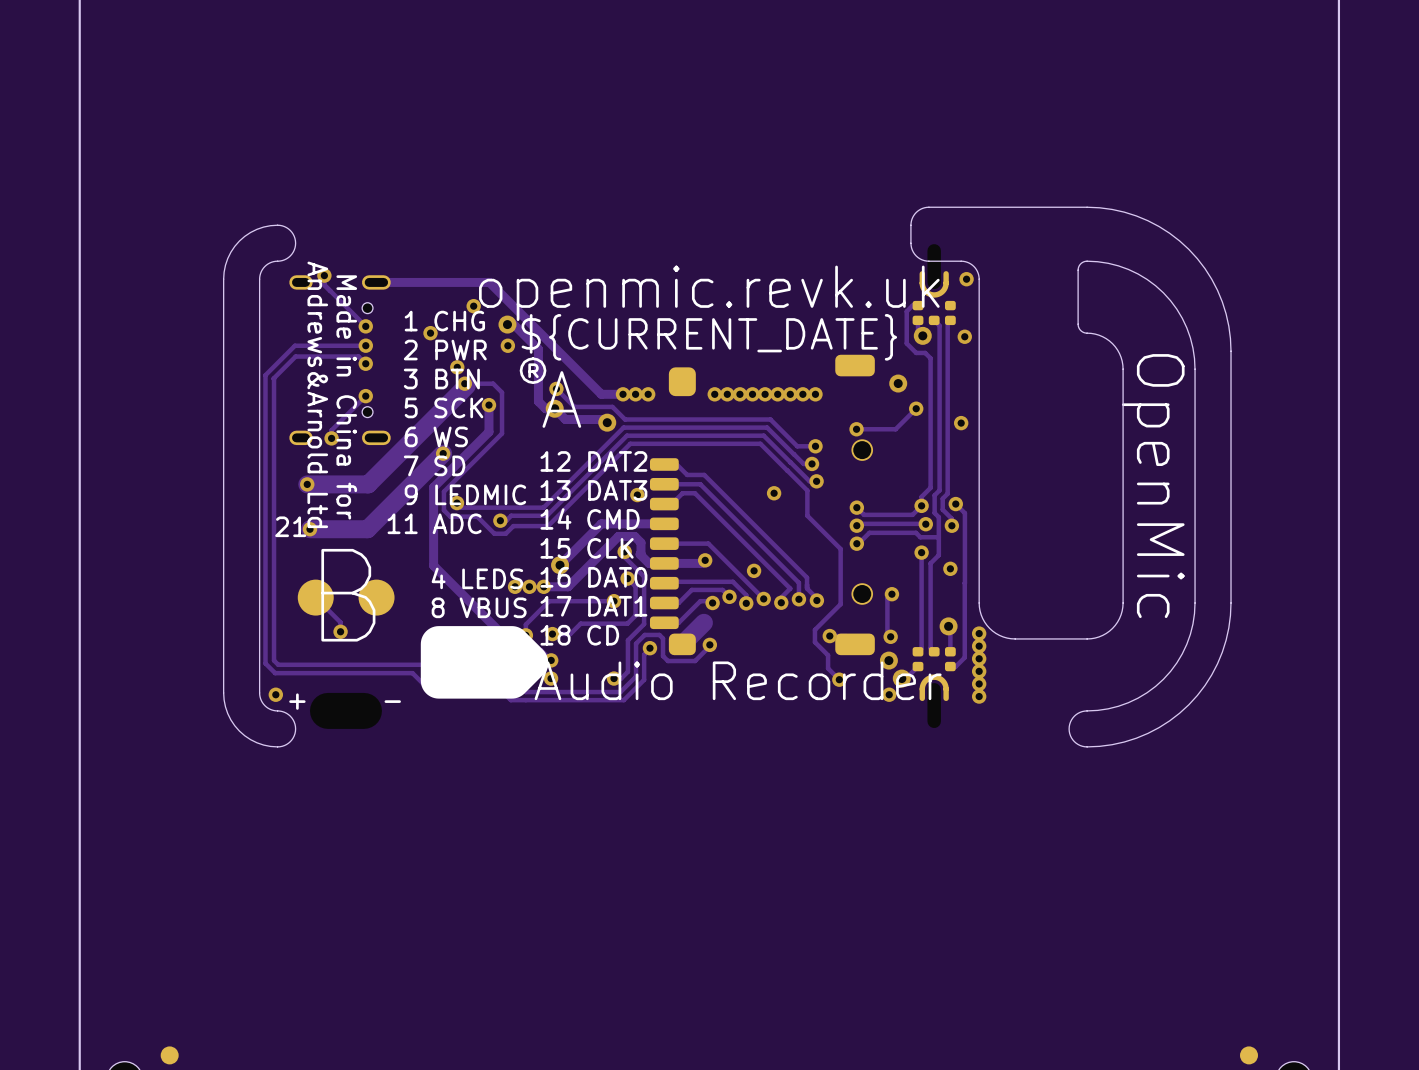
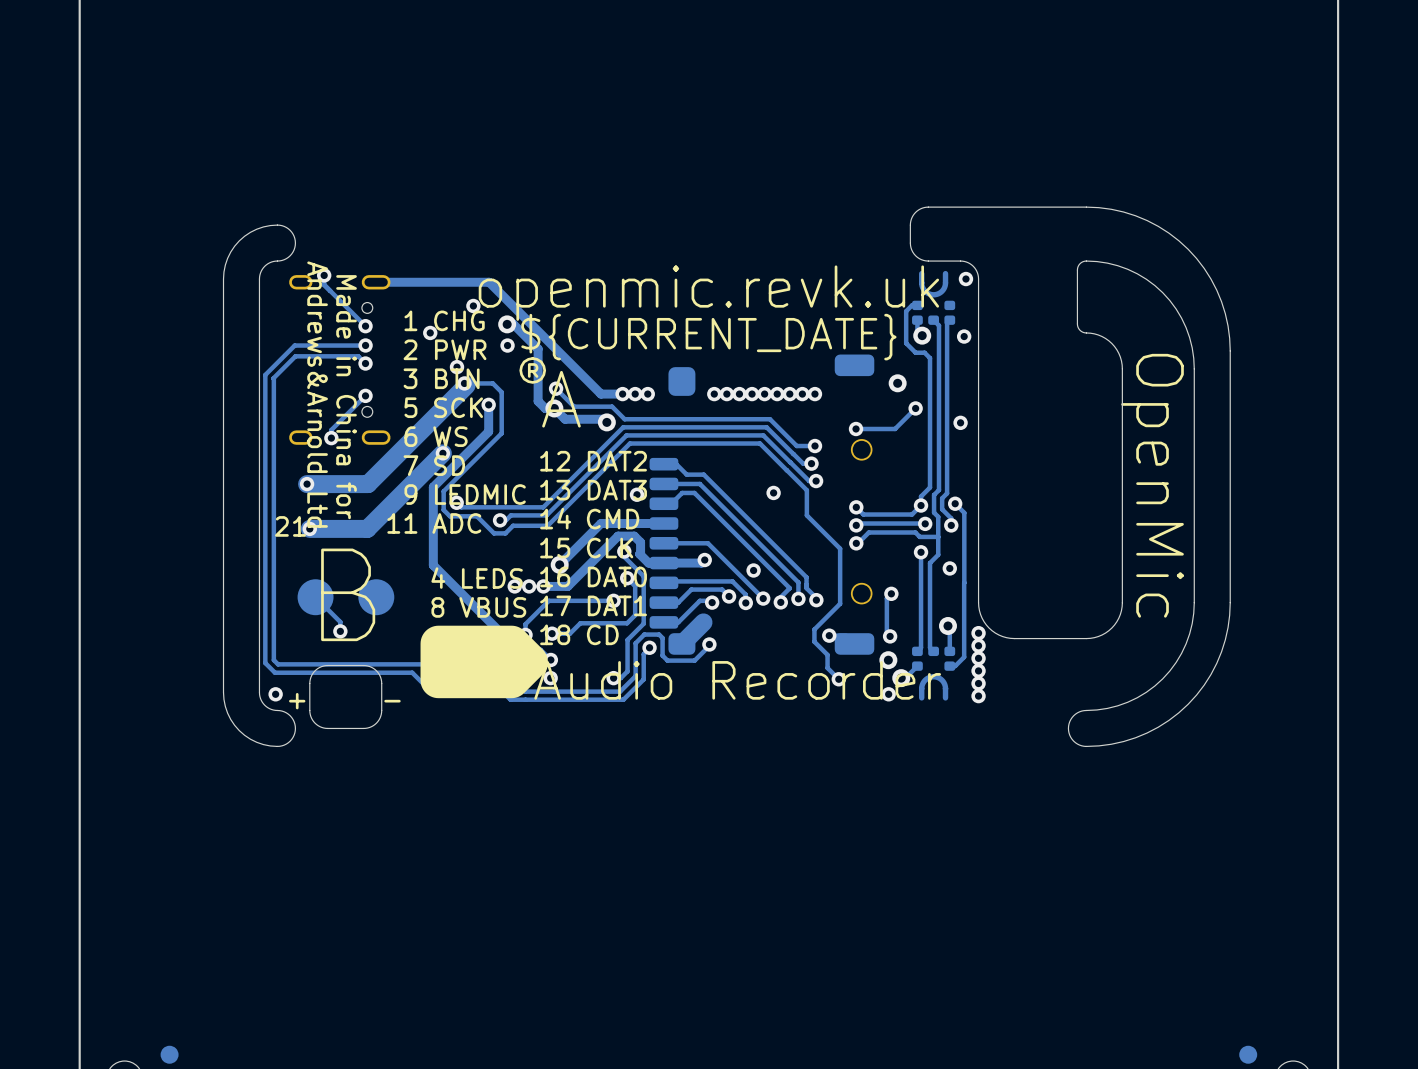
part footprint: [309, 692, 382, 729] -> [309, 665, 383, 729]

